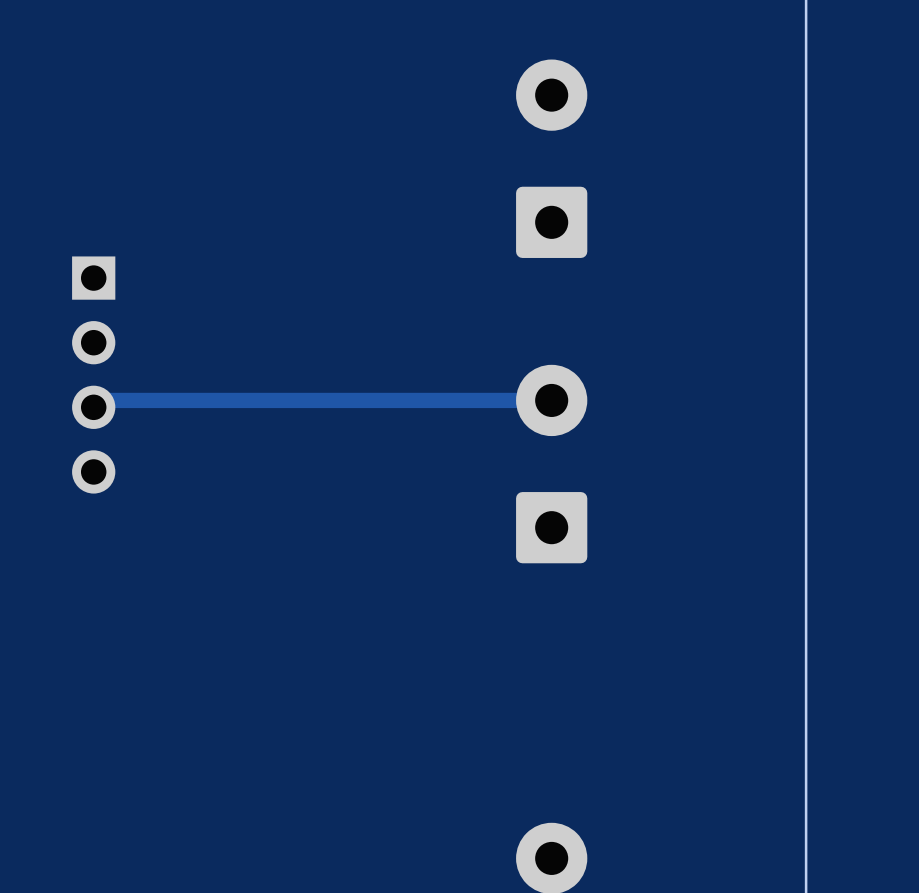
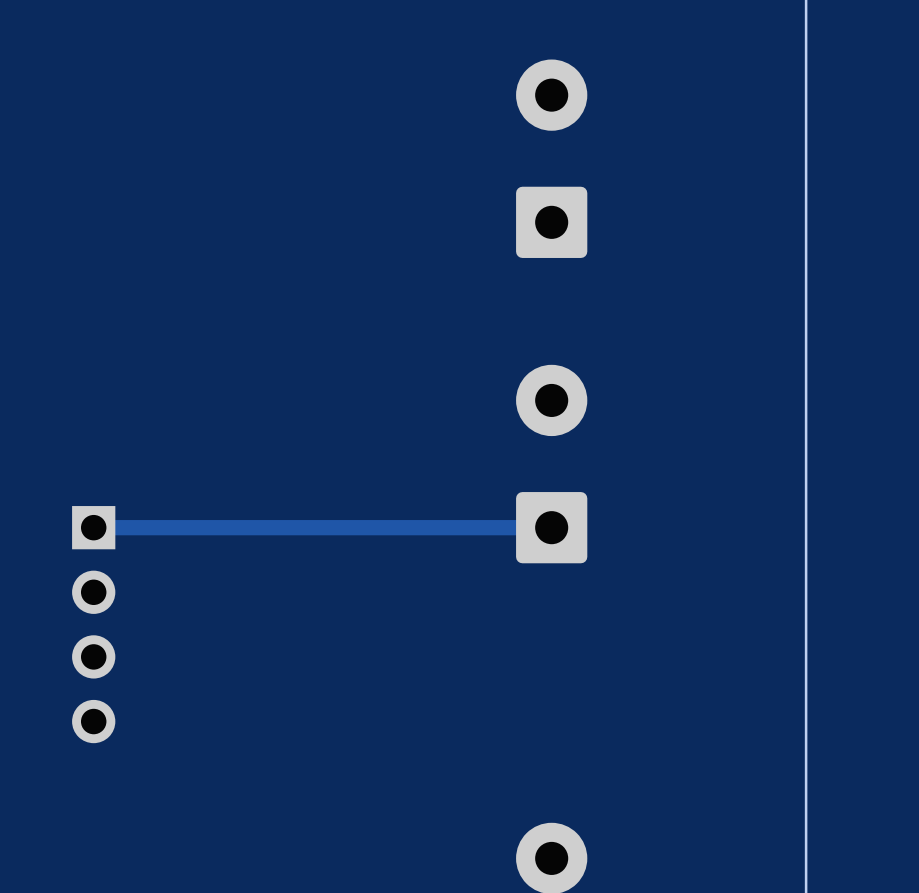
part position: (93, 375) -> (93, 624)
track: (551, 400) (100, 400) (93, 407) -> none
track: none -> (551, 527) (93, 527)

